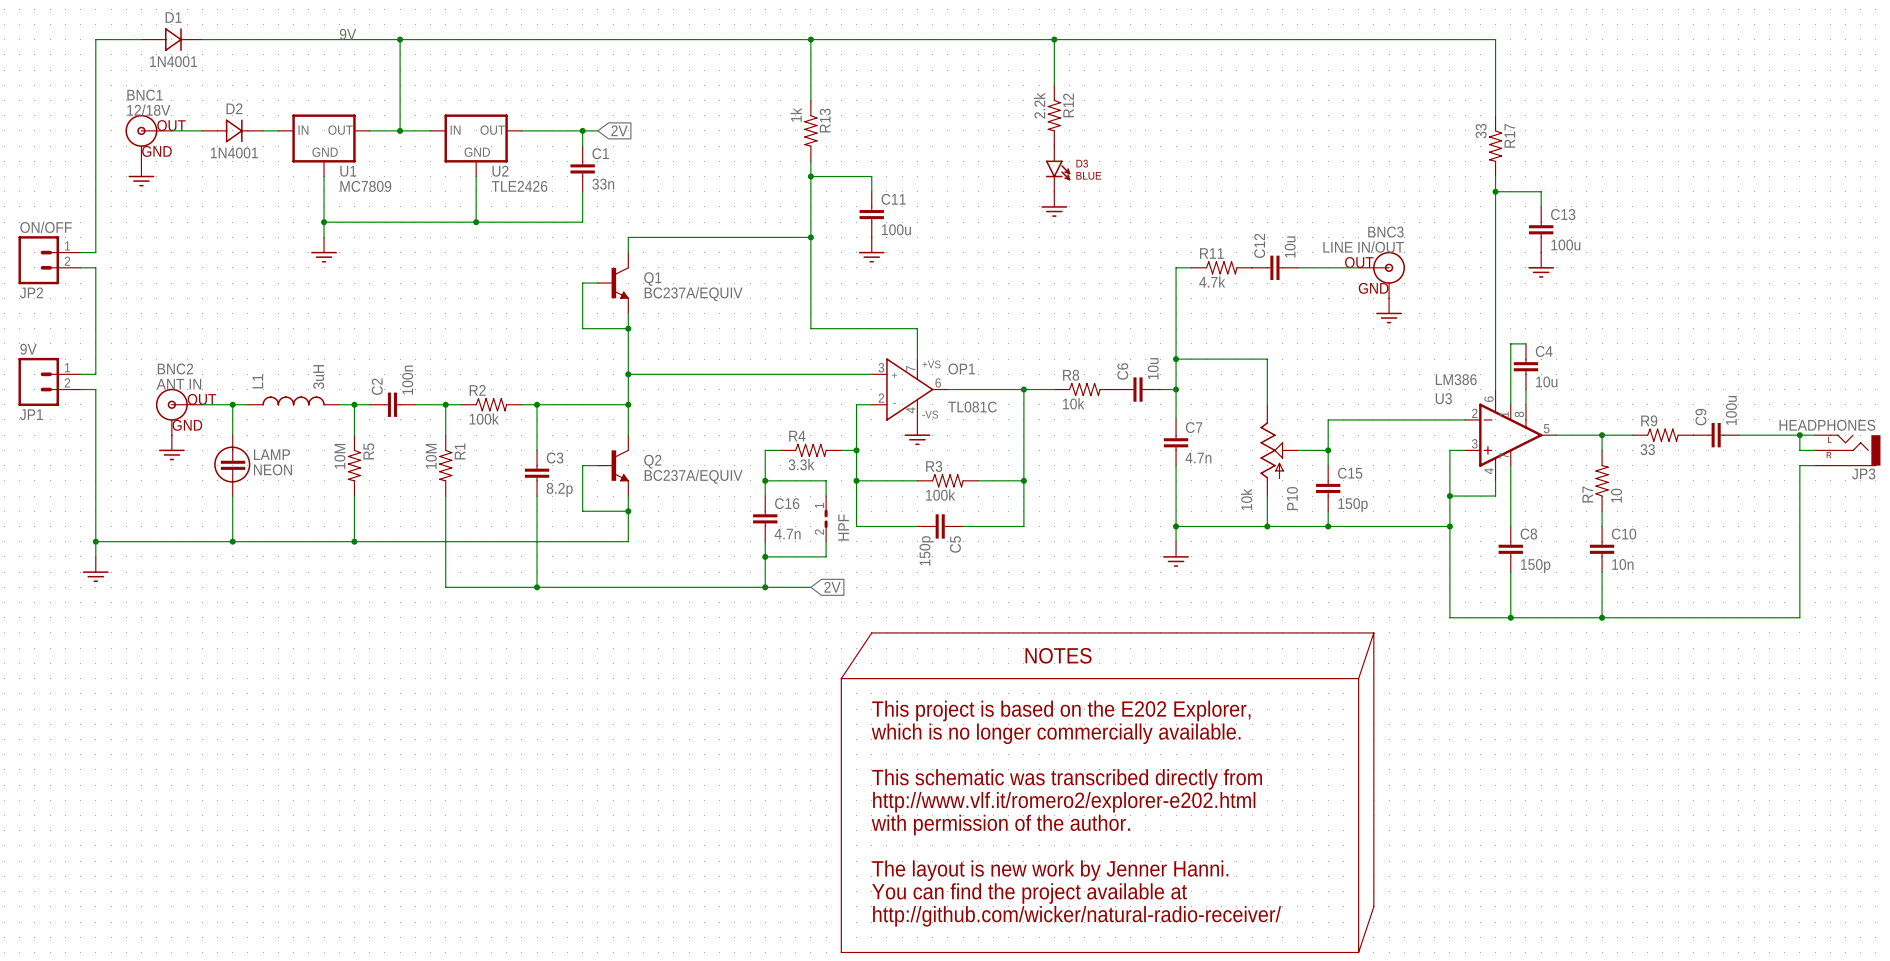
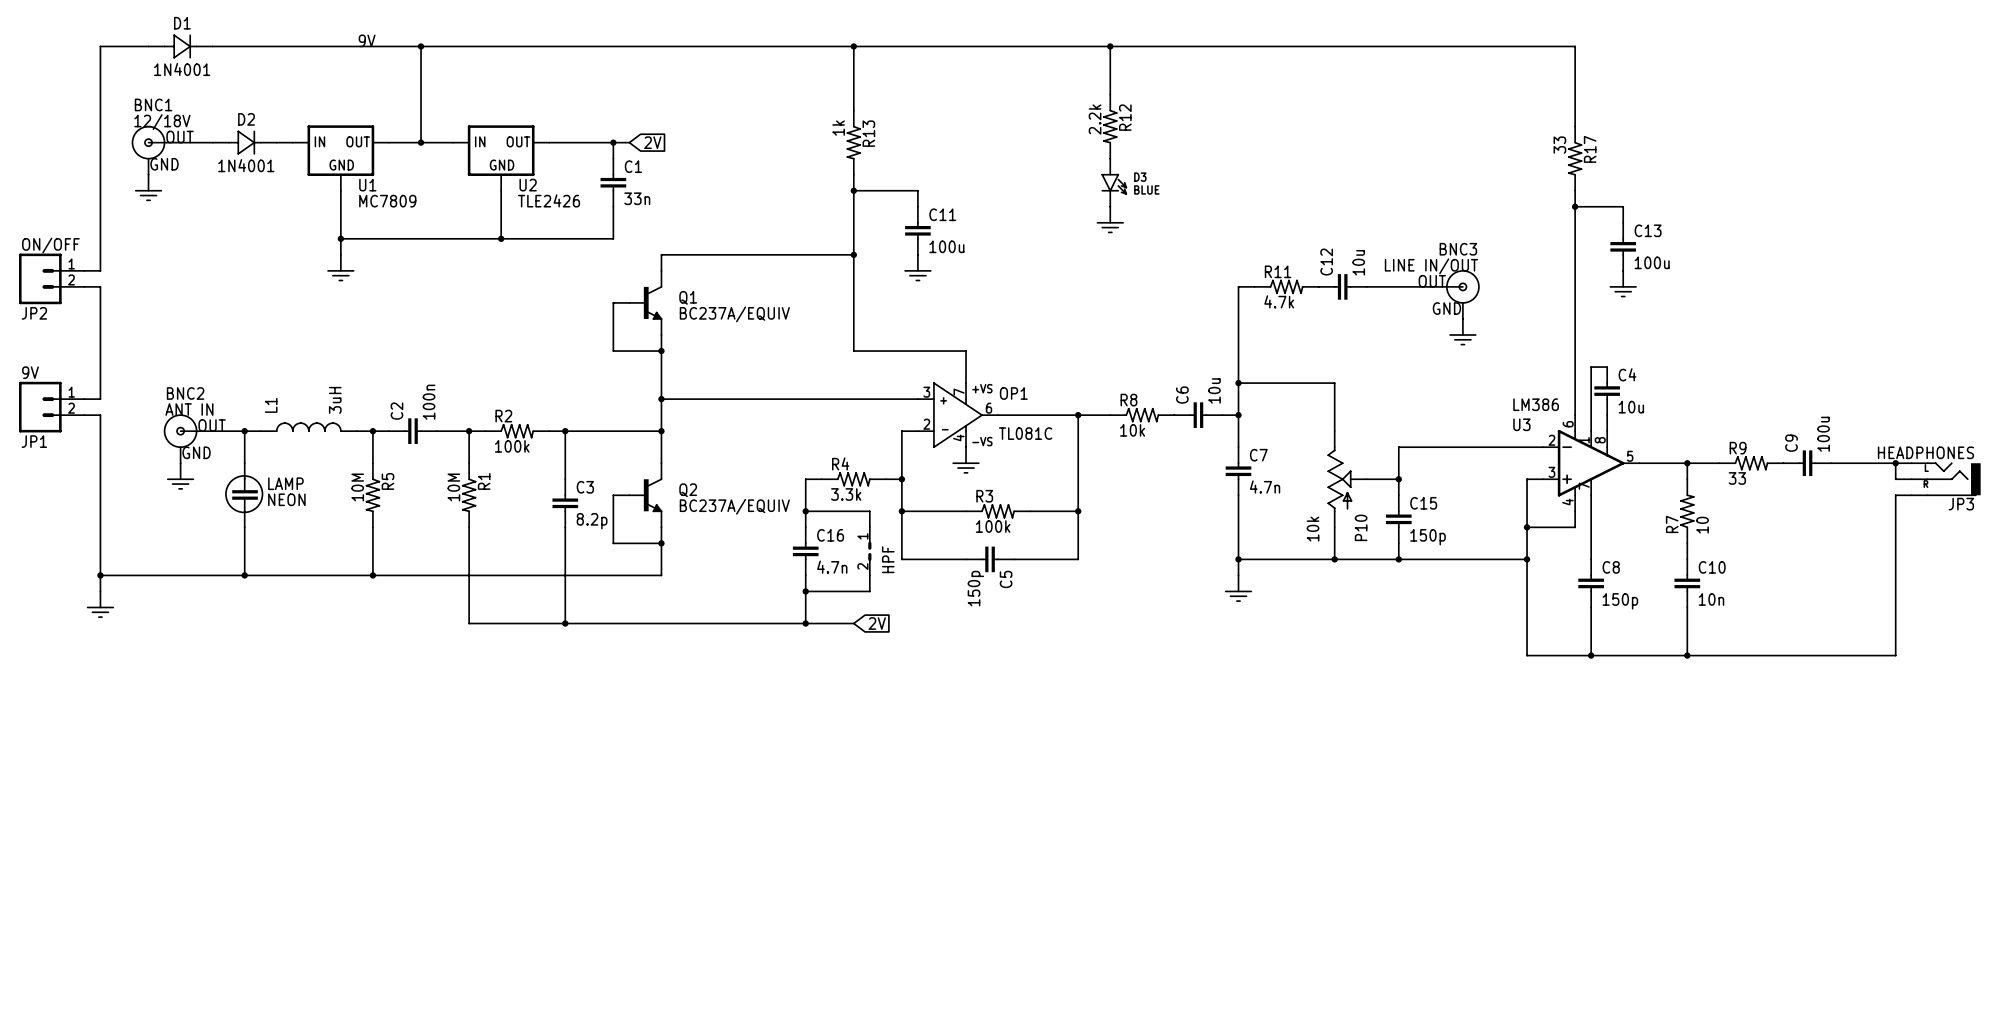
line: (1373, 632) (871, 632) (841, 678) -> none
line: (1373, 632) (1358, 678) -> none
line: (1373, 632) (1373, 906) (1358, 952) -> none
text: NOTES (1058, 655) -> none
line: (841, 678) (841, 952) (1358, 952) -> none
line: (841, 678) (1358, 678) -> none
line: (1358, 678) (1358, 952) -> none
text: This project is based on the E202 Explorer, (1061, 710) -> none
text: which is no longer commercially available. (1056, 733) -> none
text: This schematic was transcribed directly from (1067, 779) -> none
text: http://www.vlf.it/romero2/explorer-e202.html (1064, 802) -> none
text: with permission of the author. (1000, 825) -> none
text: The layout is new work by Jenner Hanni. (1050, 870) -> none
text: You can find the project available at (1029, 893) -> none
text: http://github.com/wicker/natural-radio-receiver/ (1077, 916) -> none

